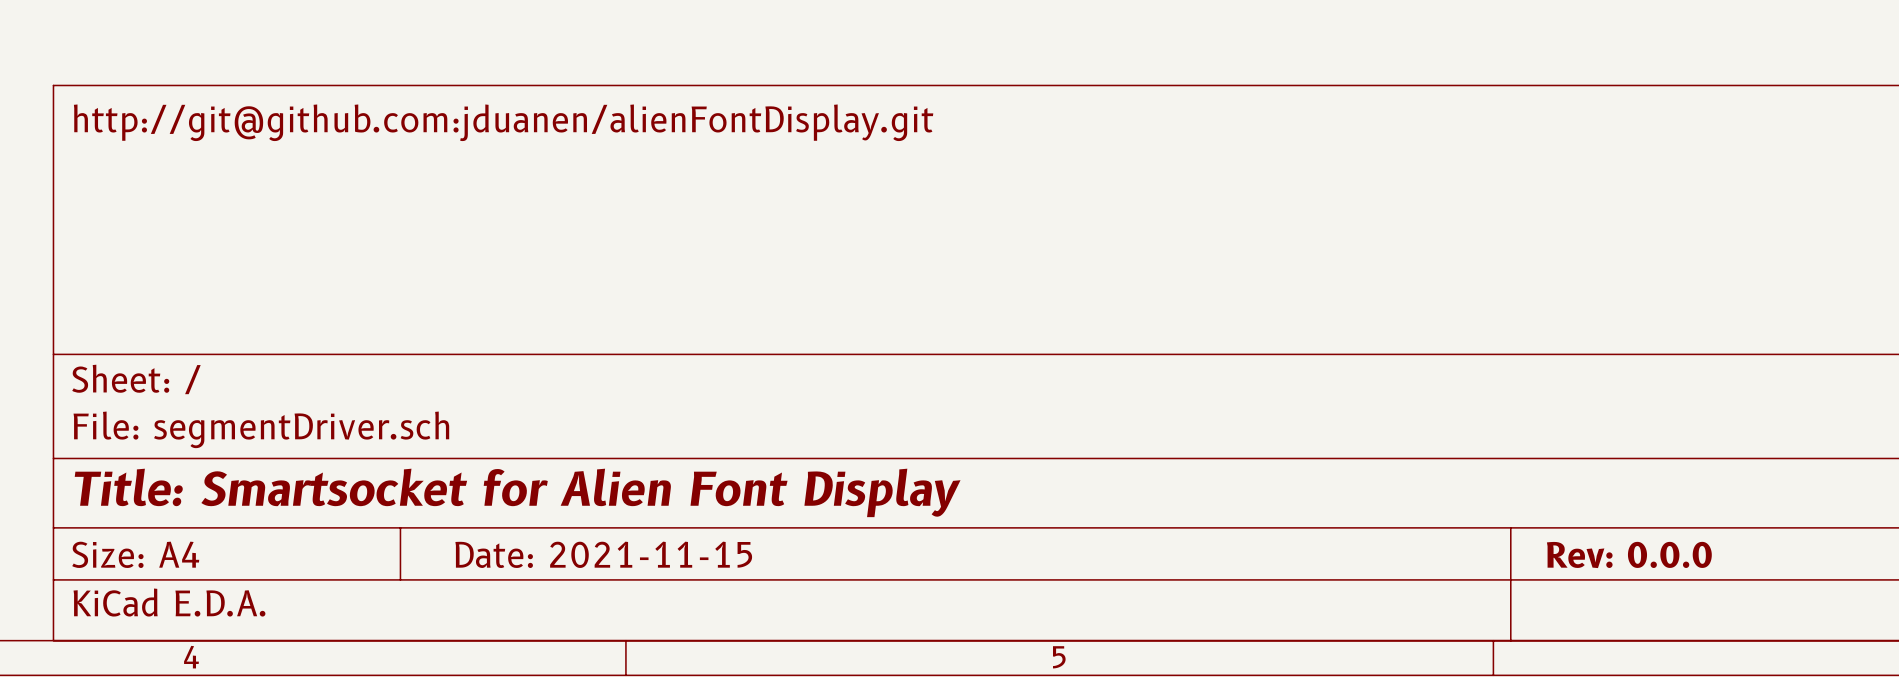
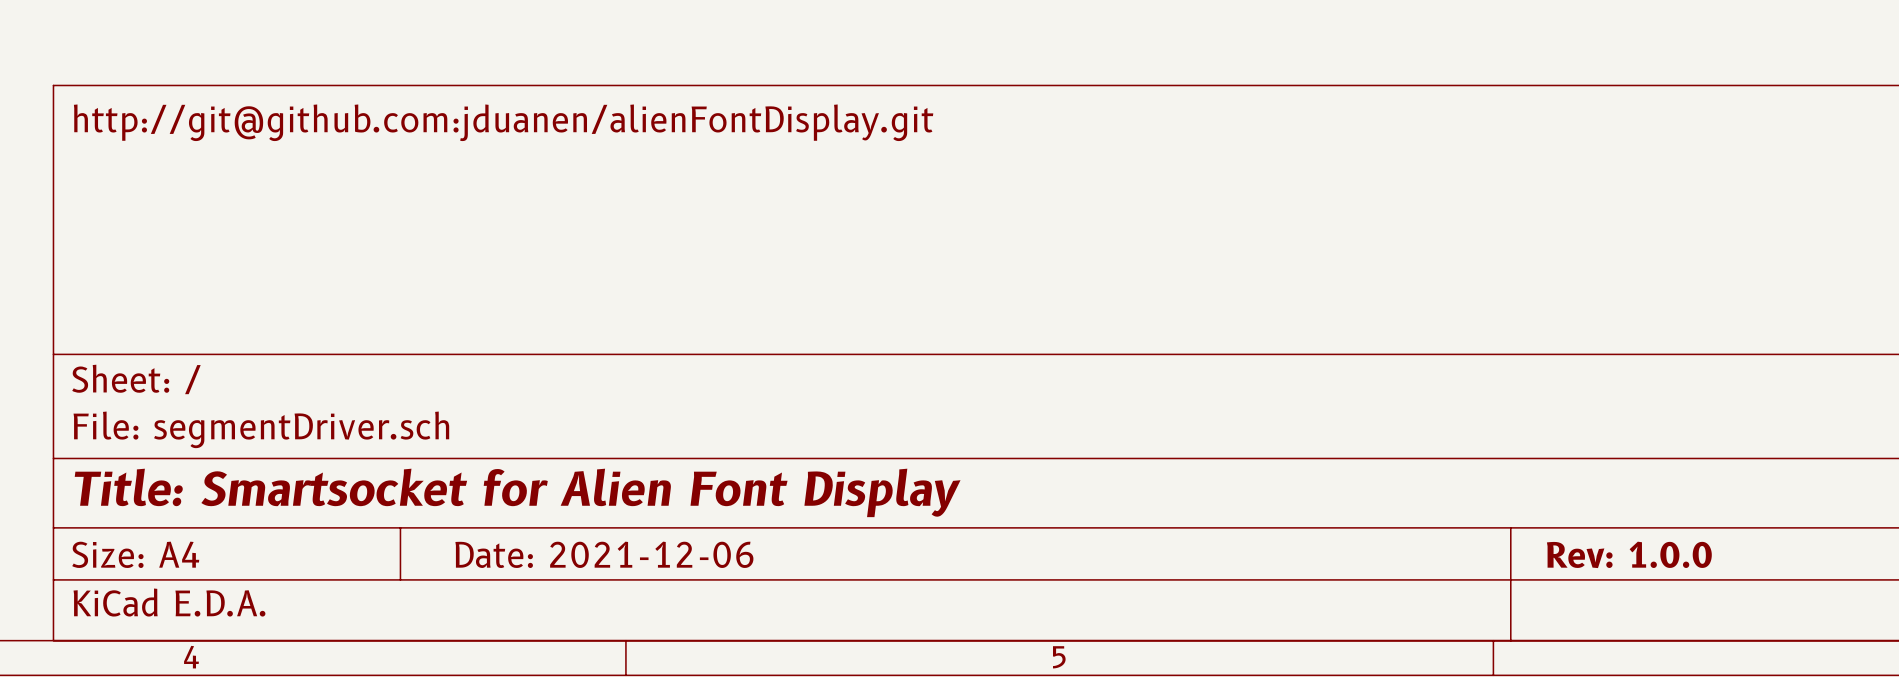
title block: Date: 2021-11-15 (603, 554) -> Date: 2021-12-06 (604, 554)
title block: Rev: 0.0.0 (1629, 554) -> Rev: 1.0.0 (1629, 554)

